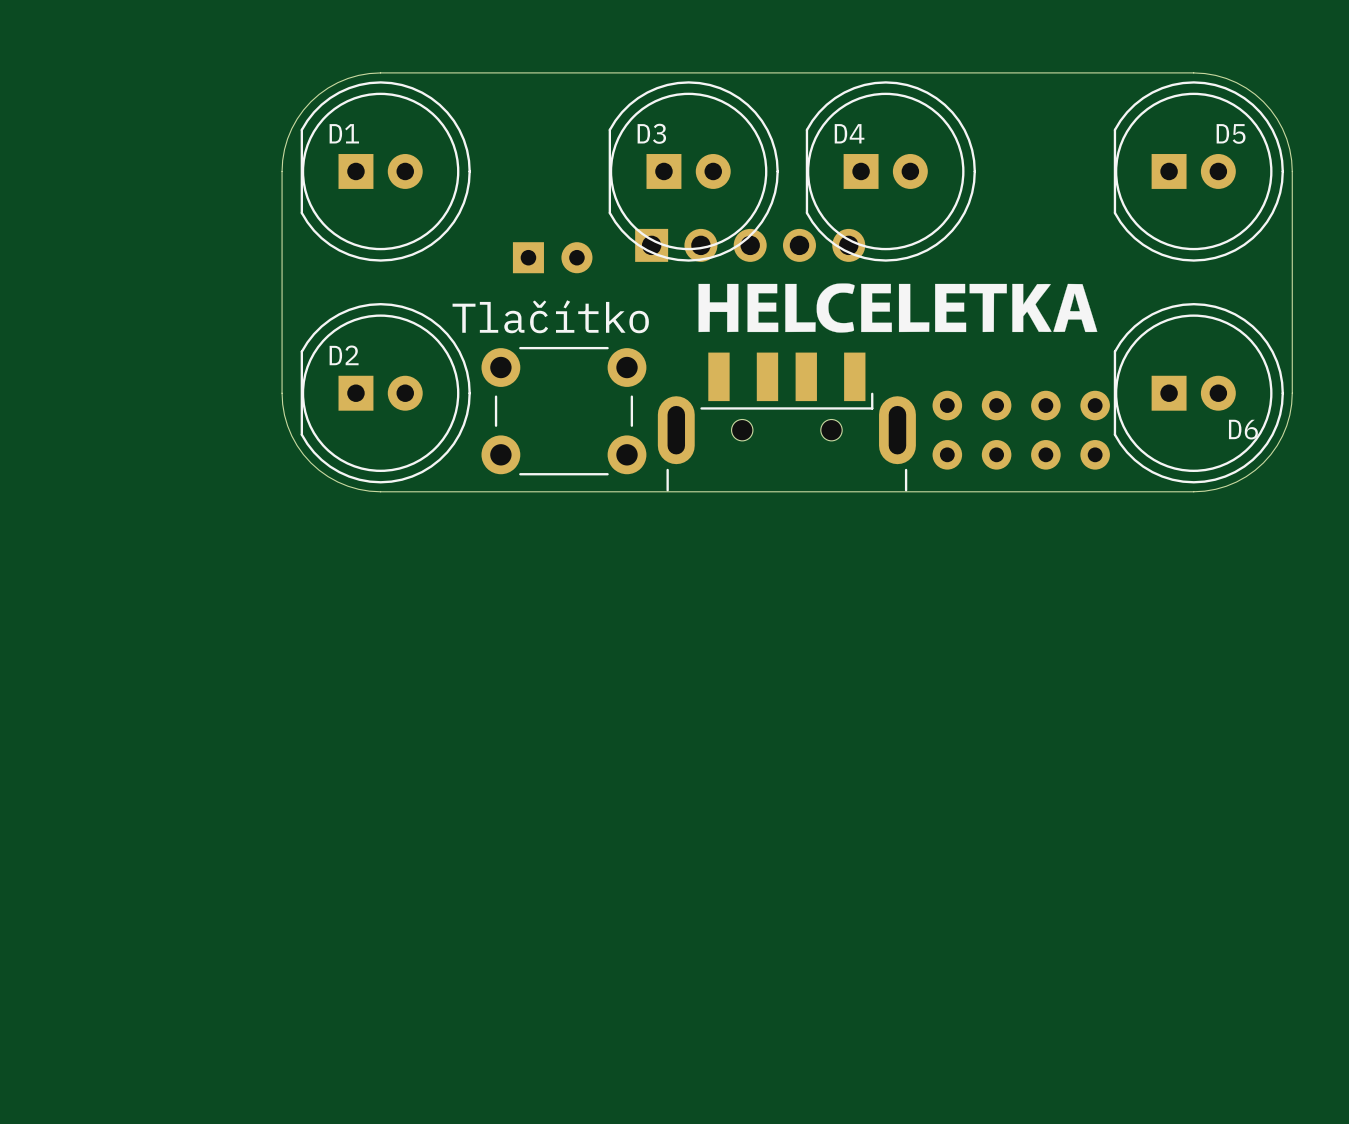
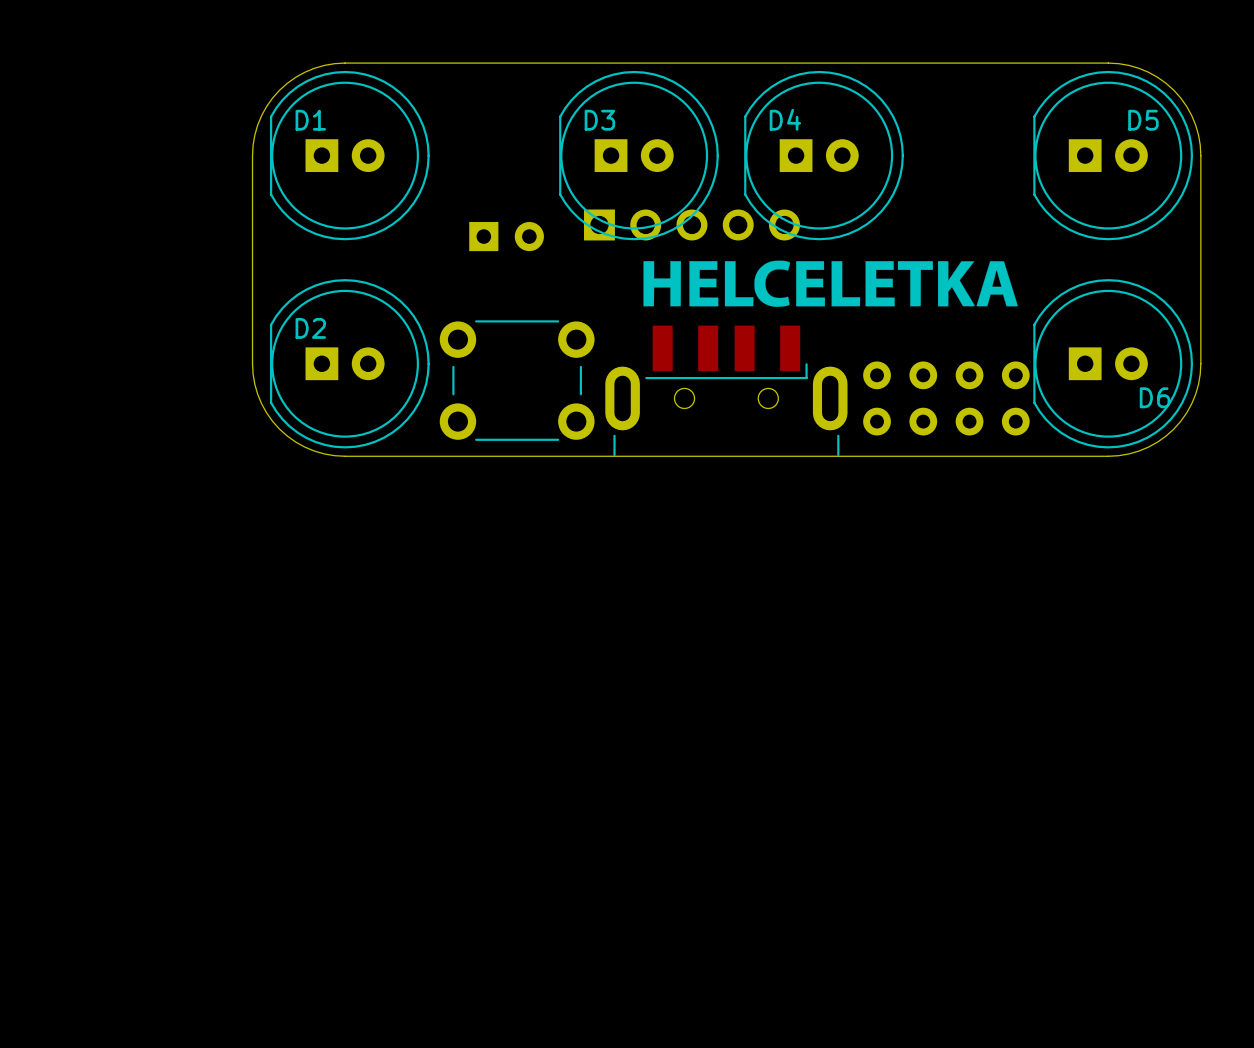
text: Tlačítko (550, 316) -> none

